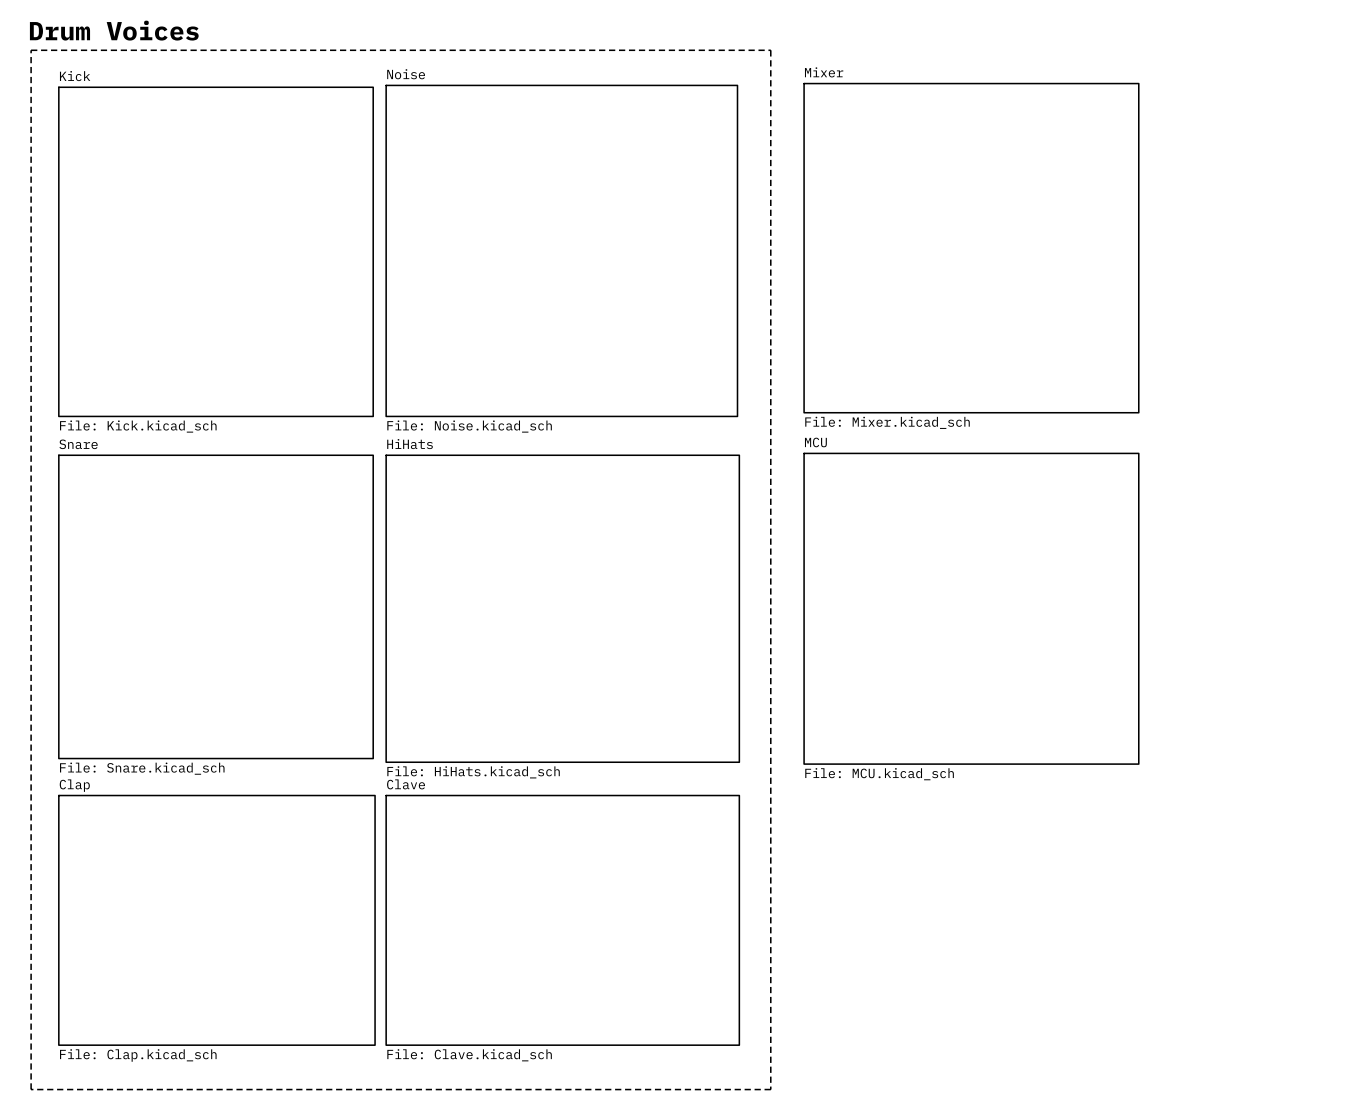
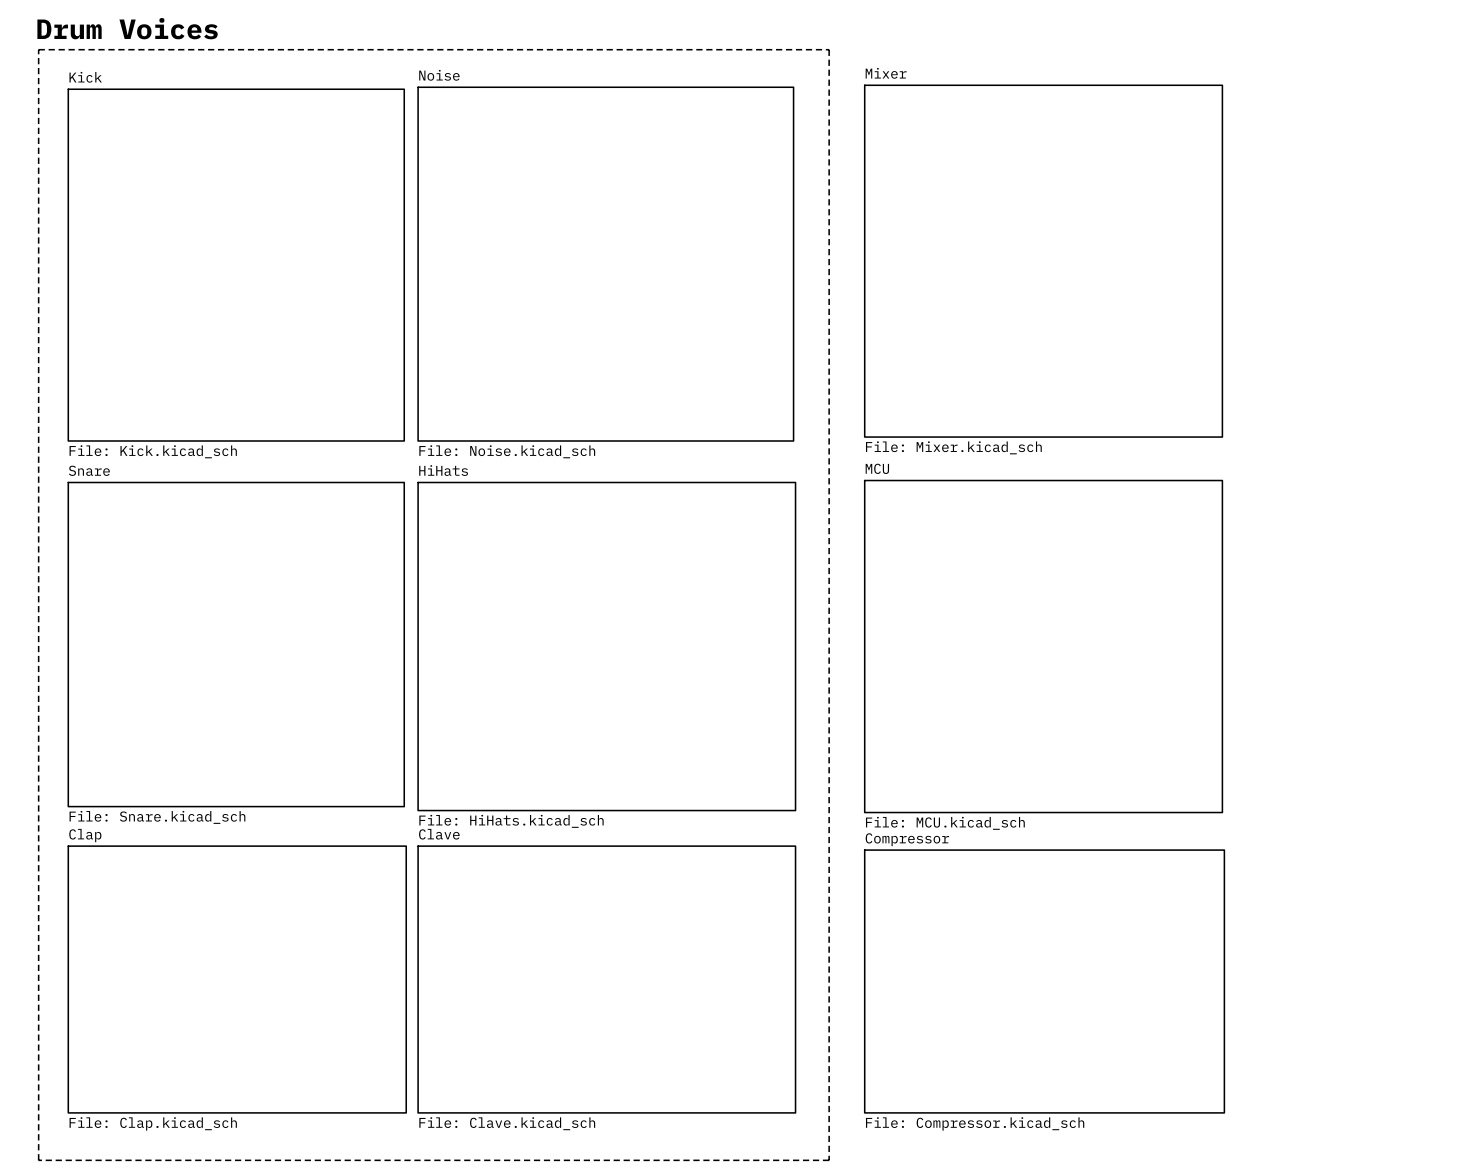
sheet Compressor: none -> File: Compressor.kicad_sch (1044, 981)

